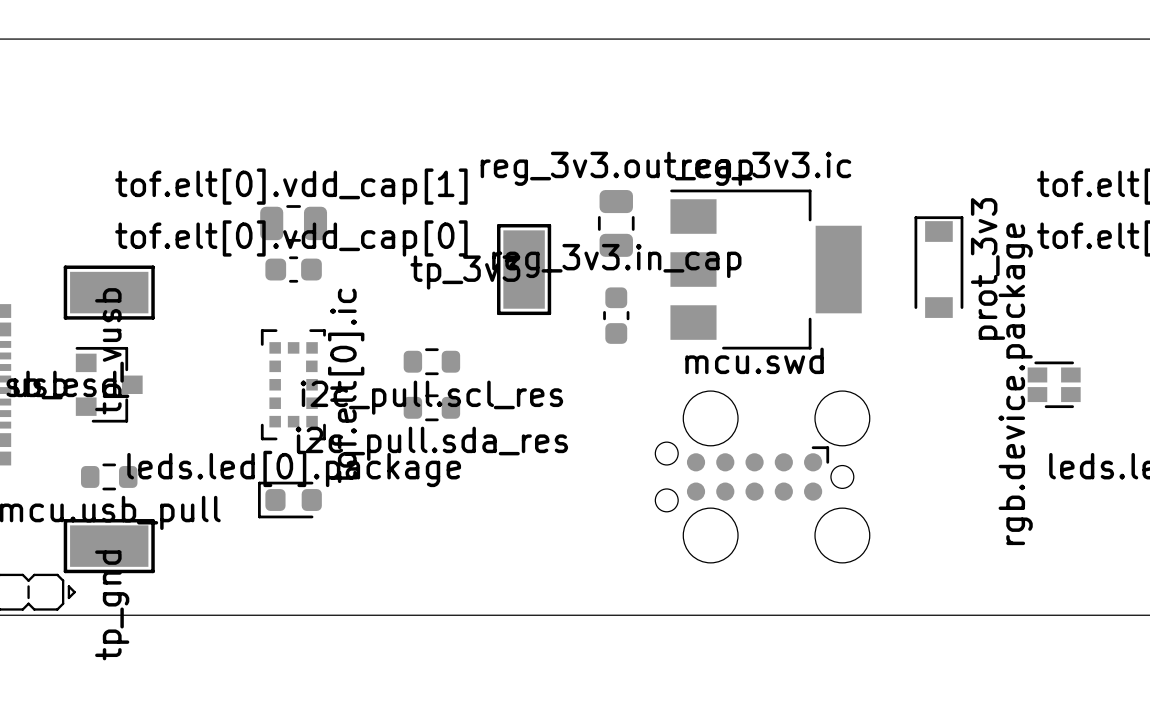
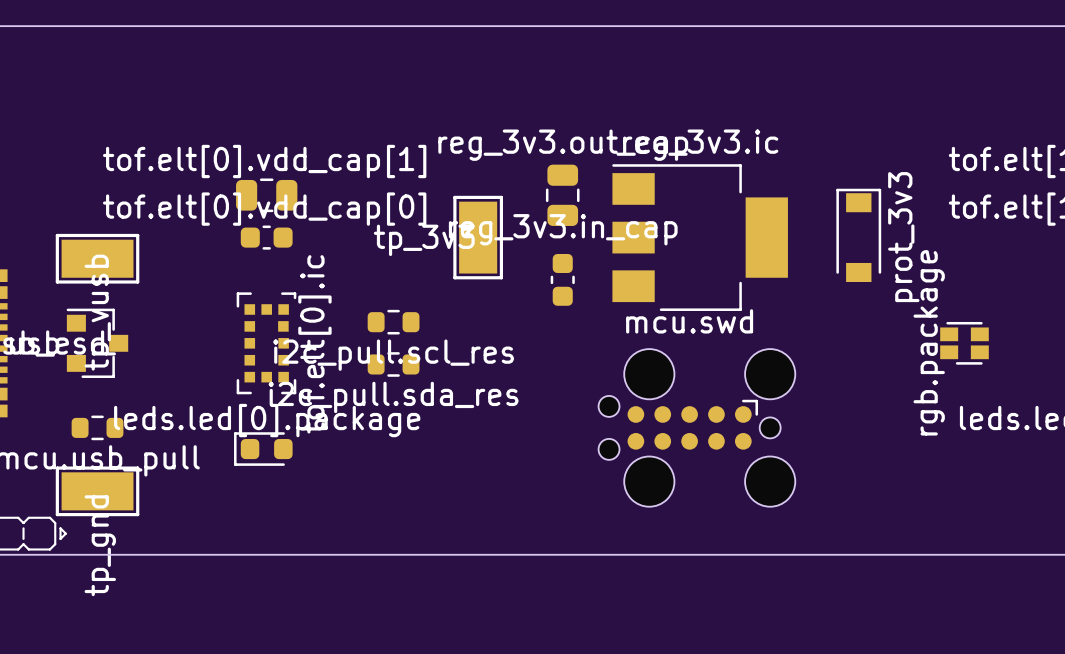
rgb.device.package name: rgb.device.package (1015, 384) -> rgb.package (929, 342)

